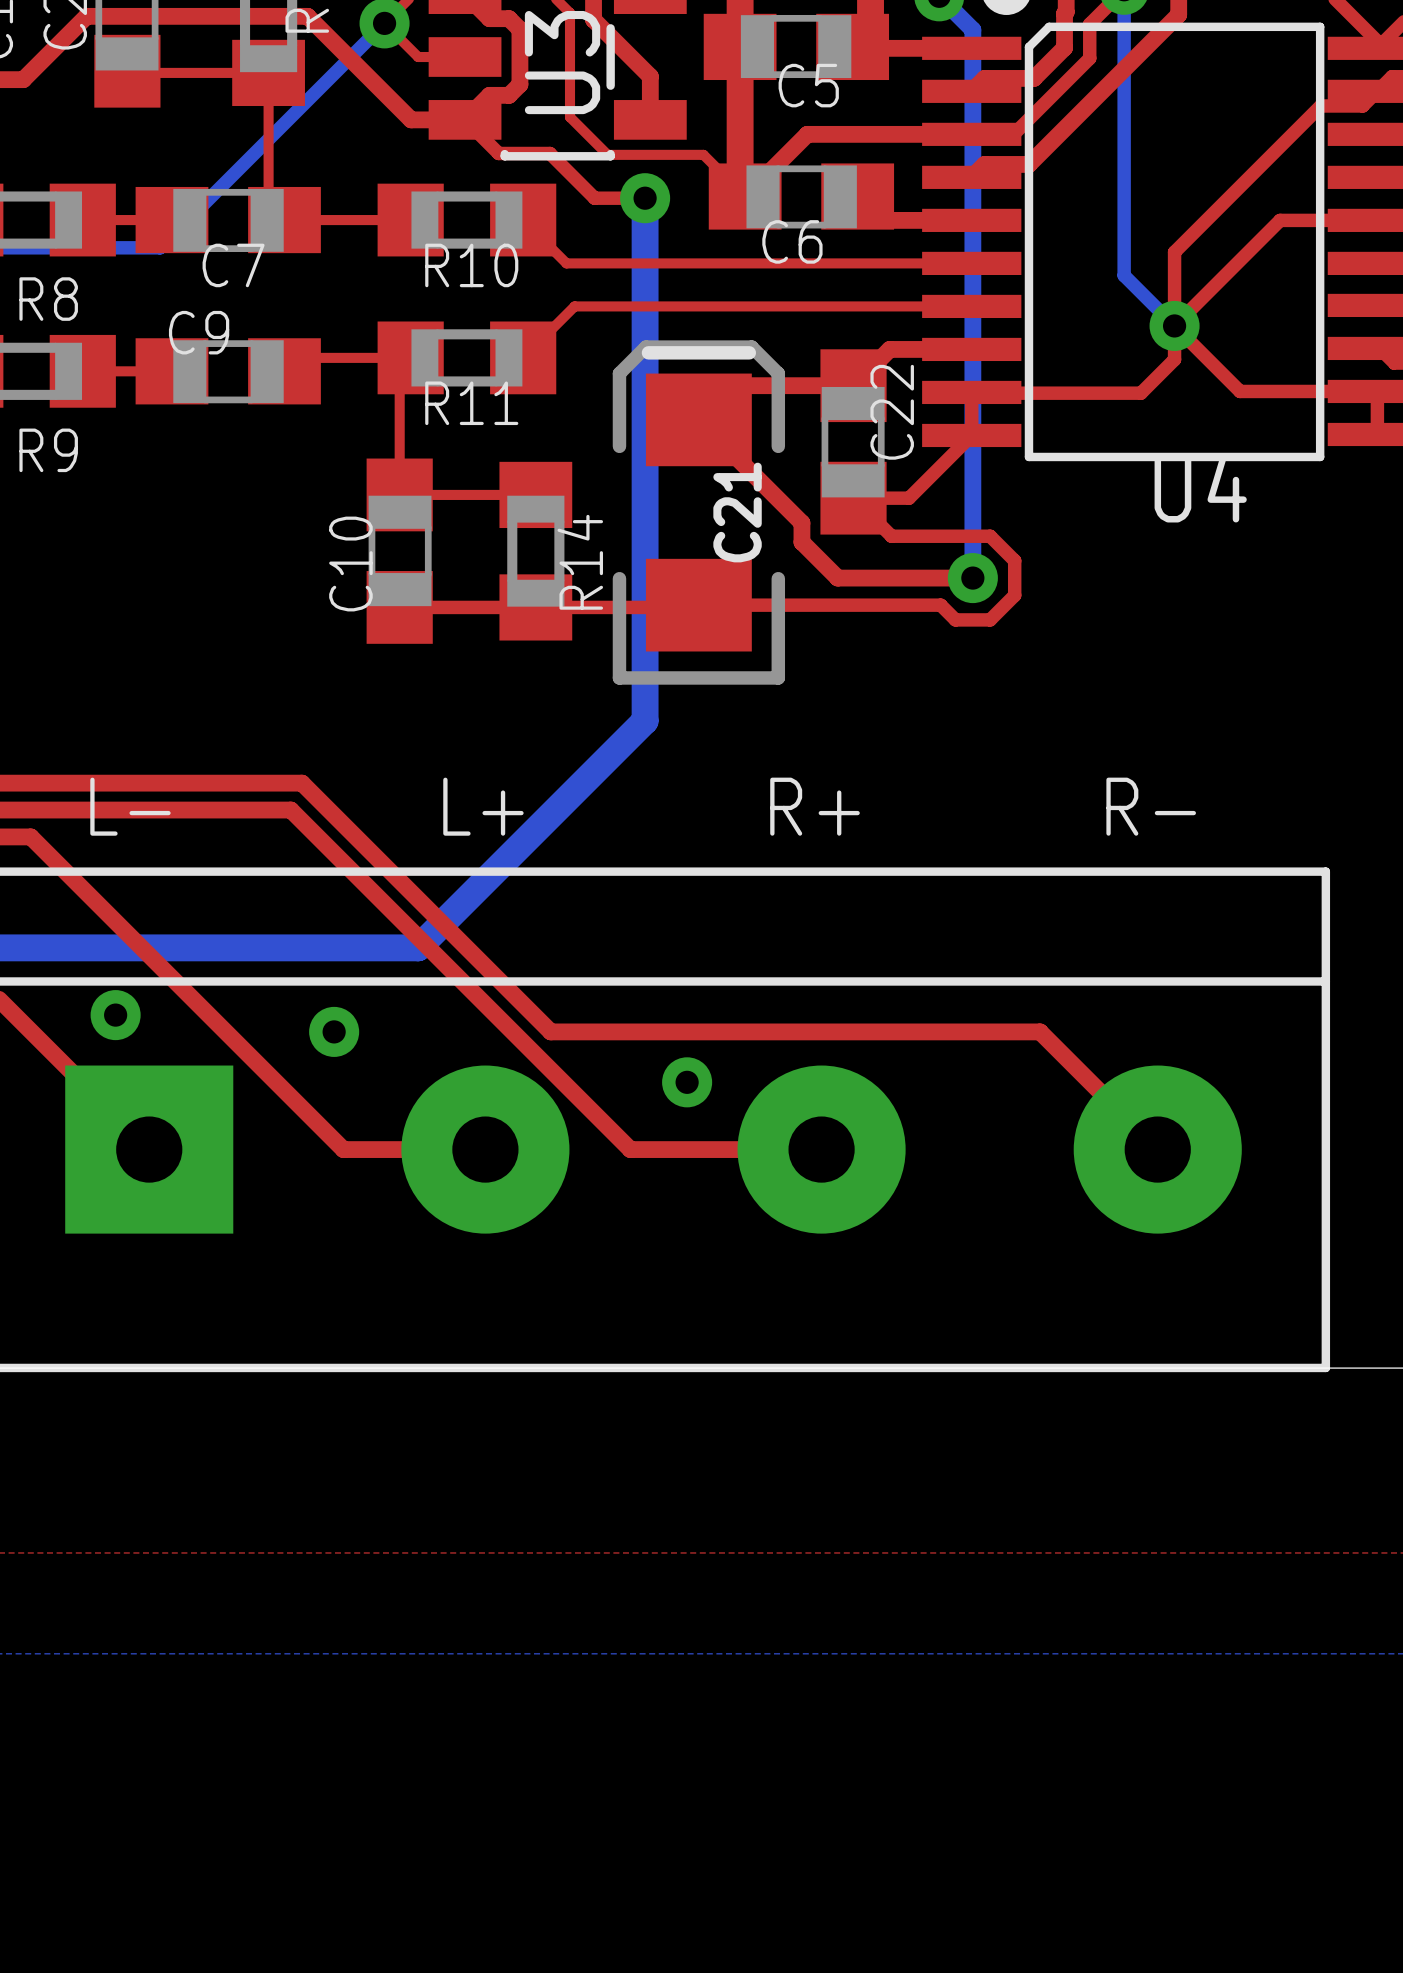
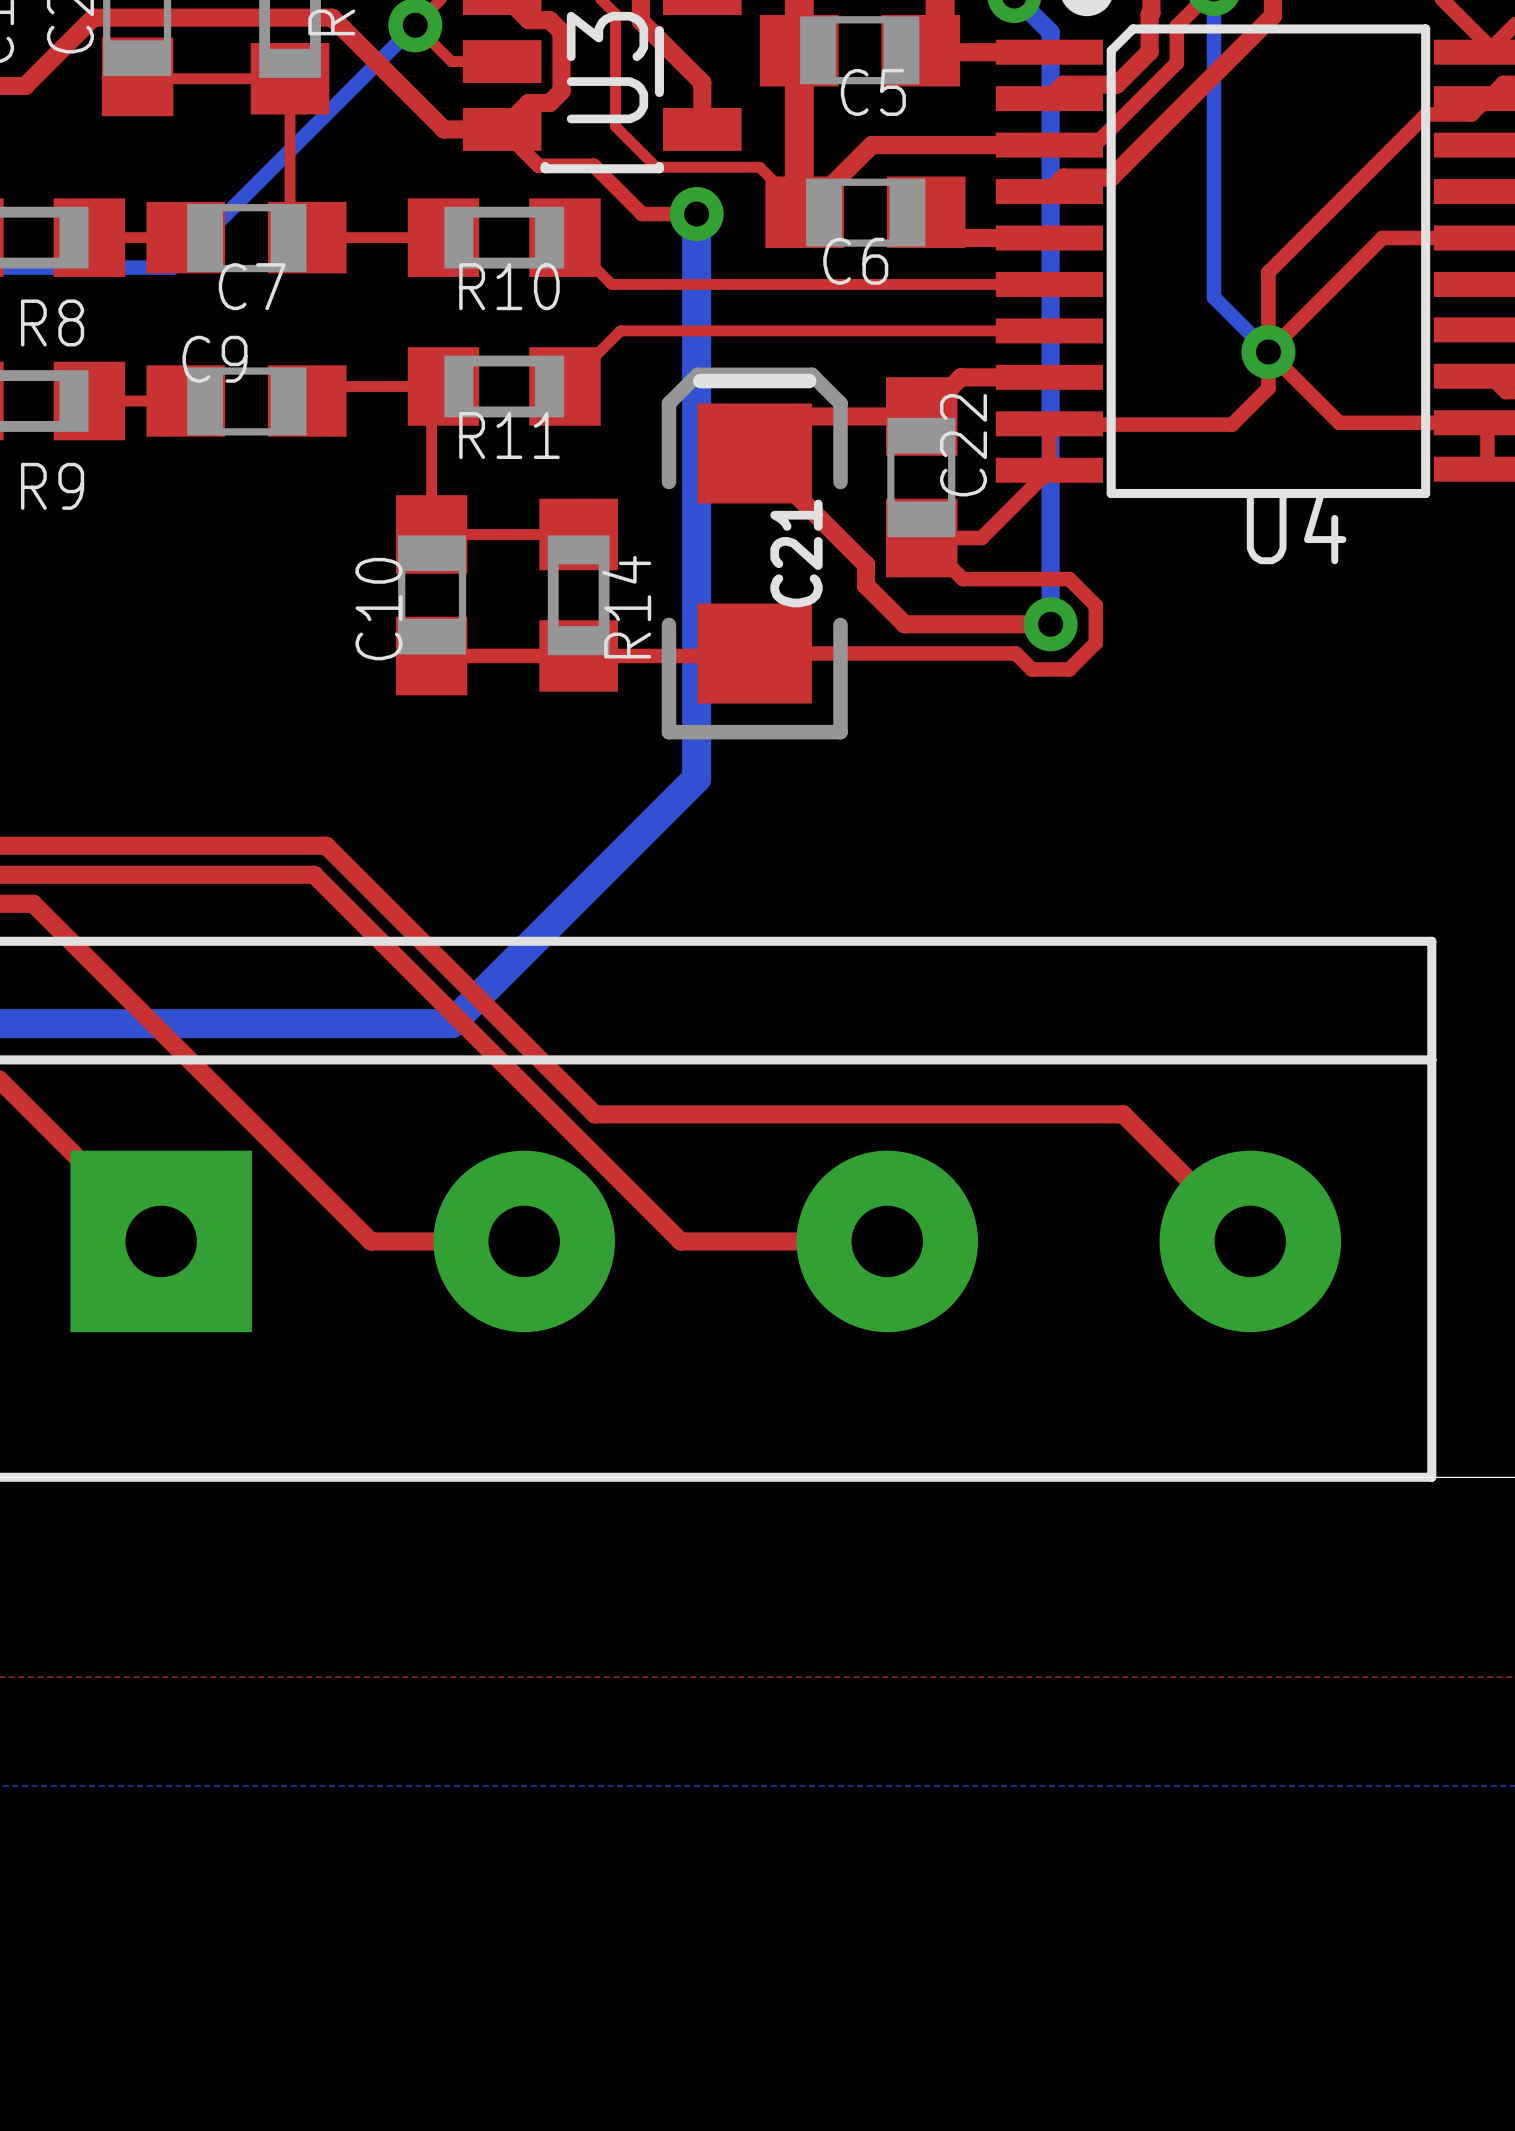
text: L- (130, 806) -> none
text: L+ (483, 806) -> none
text: R+ (815, 806) -> none
text: R- (1151, 806) -> none
via: (115, 1015) -> none
via: (334, 1031) -> none
via: (687, 1082) -> none

